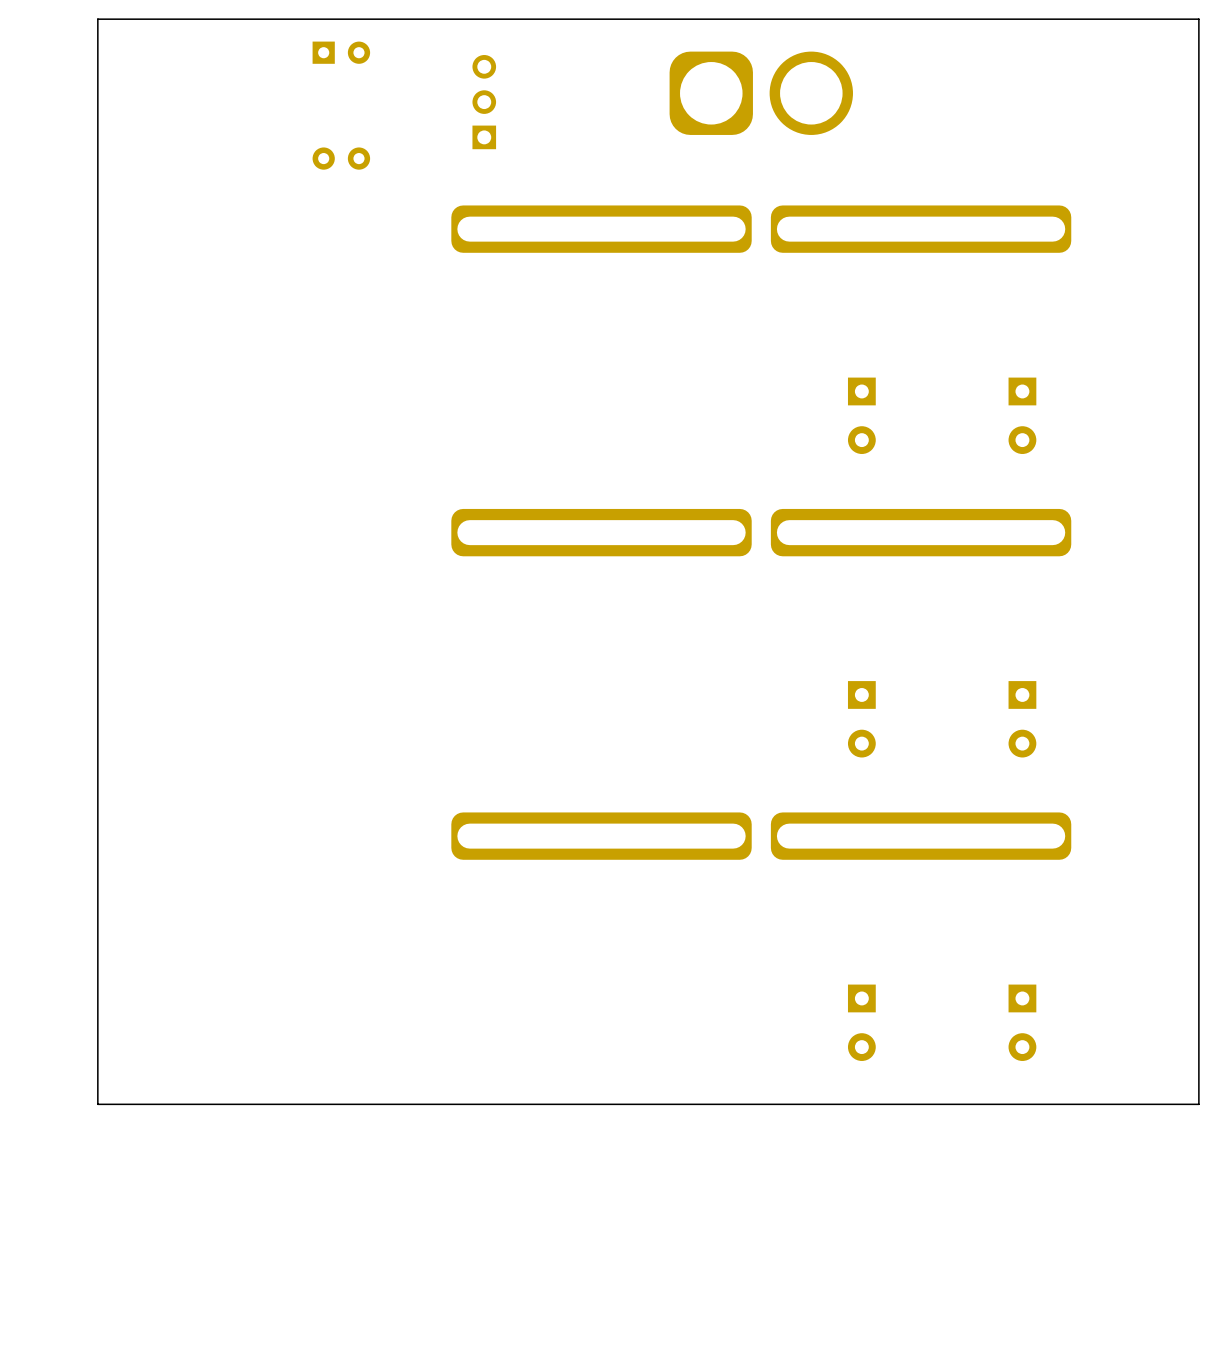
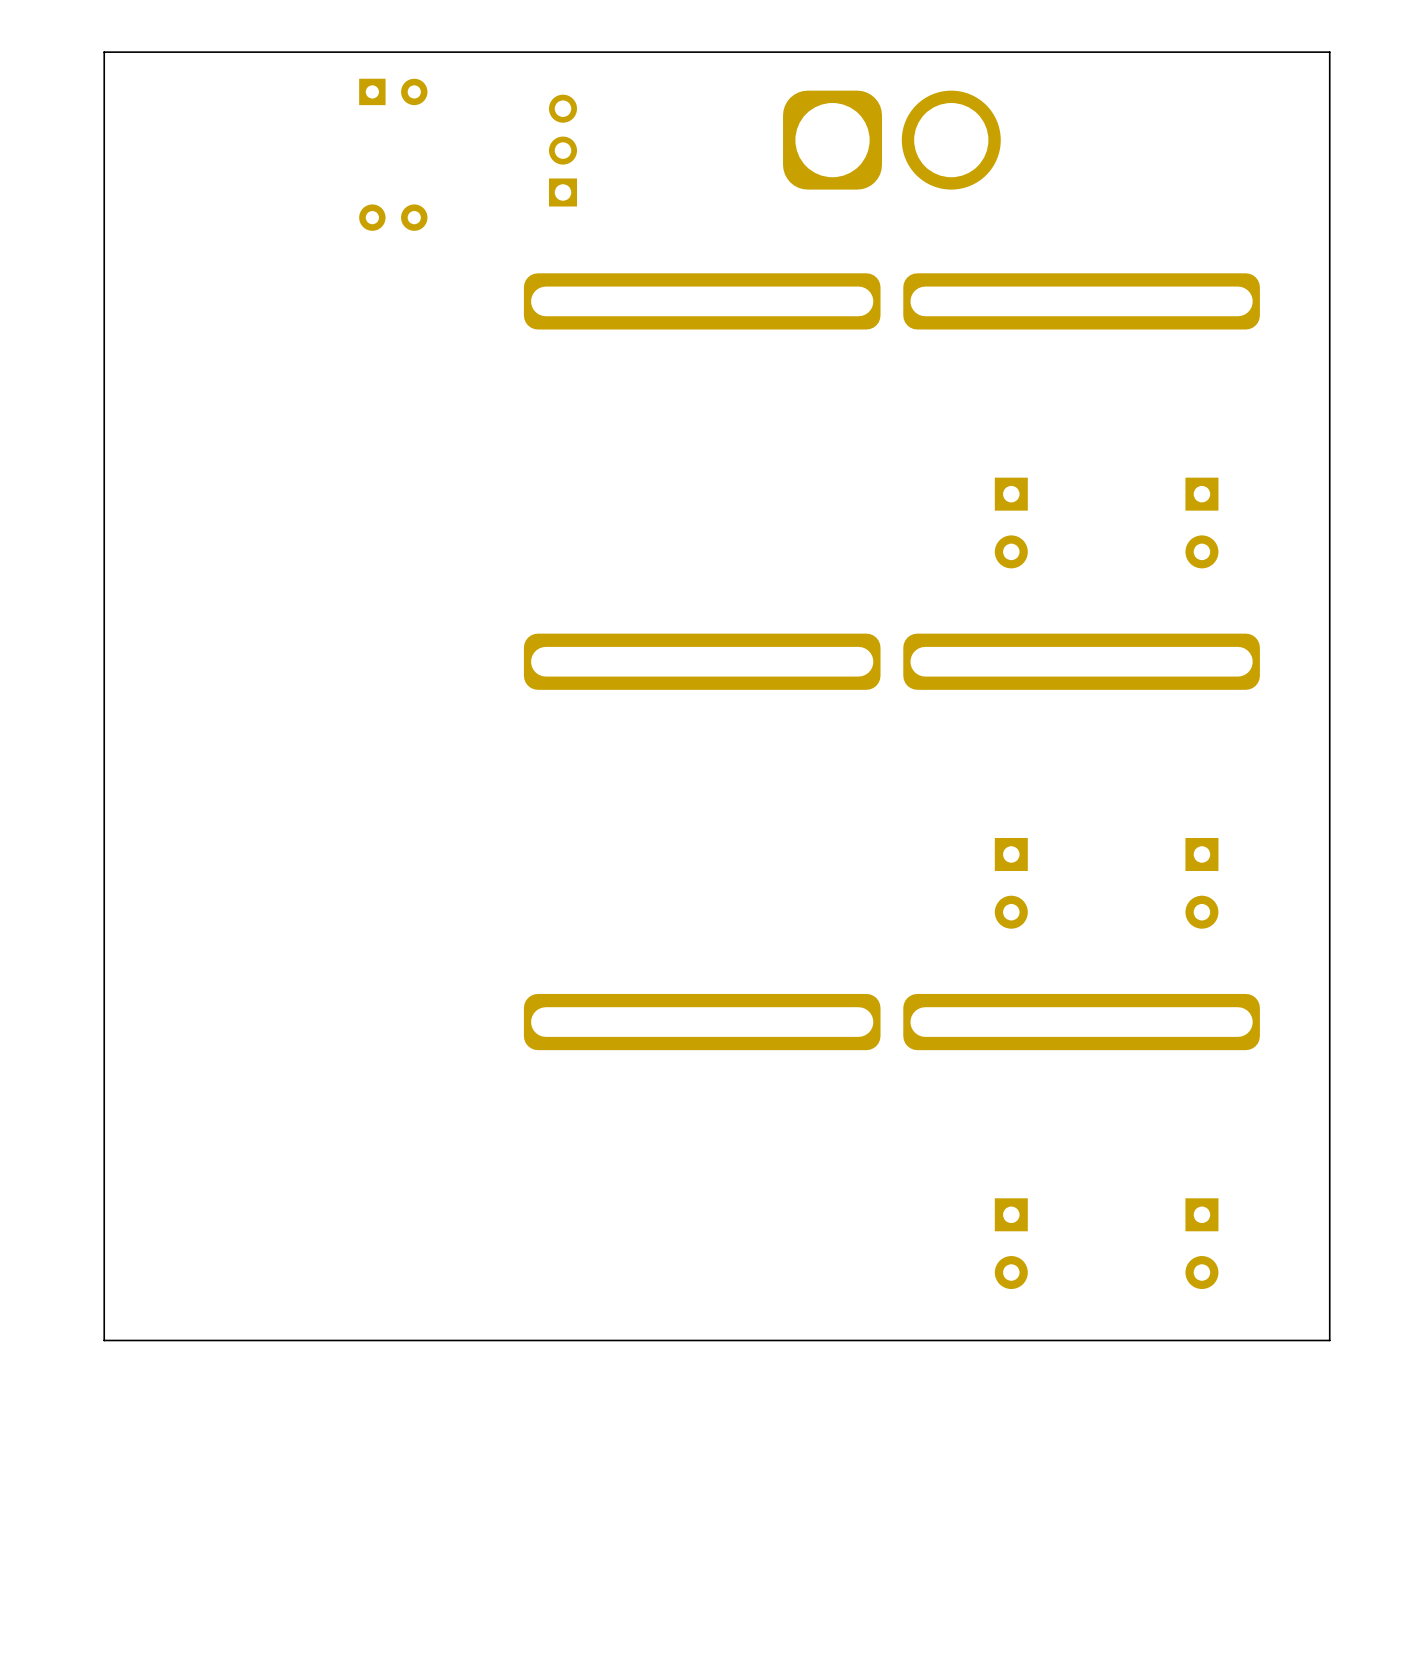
board edge: (1130, 19) (1198, 19) (1198, 1104) (1130, 1104) -> (1329, 52) (1329, 1340)

